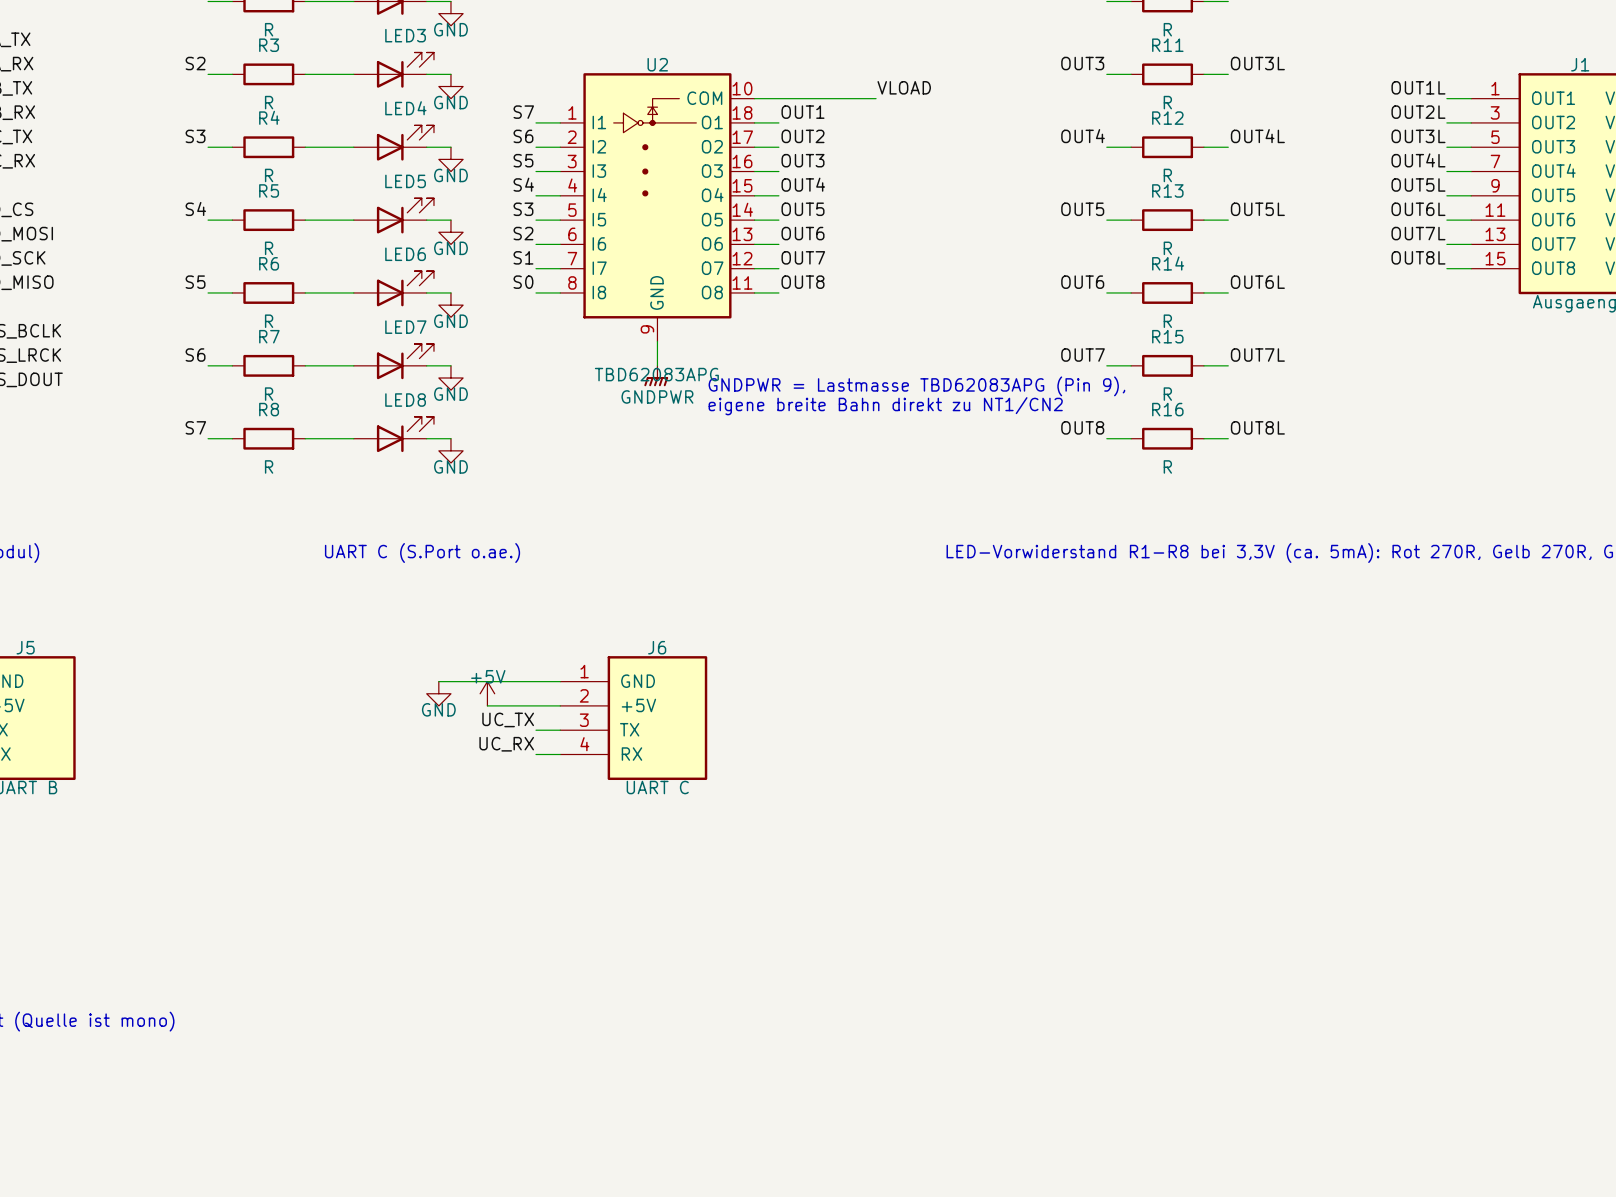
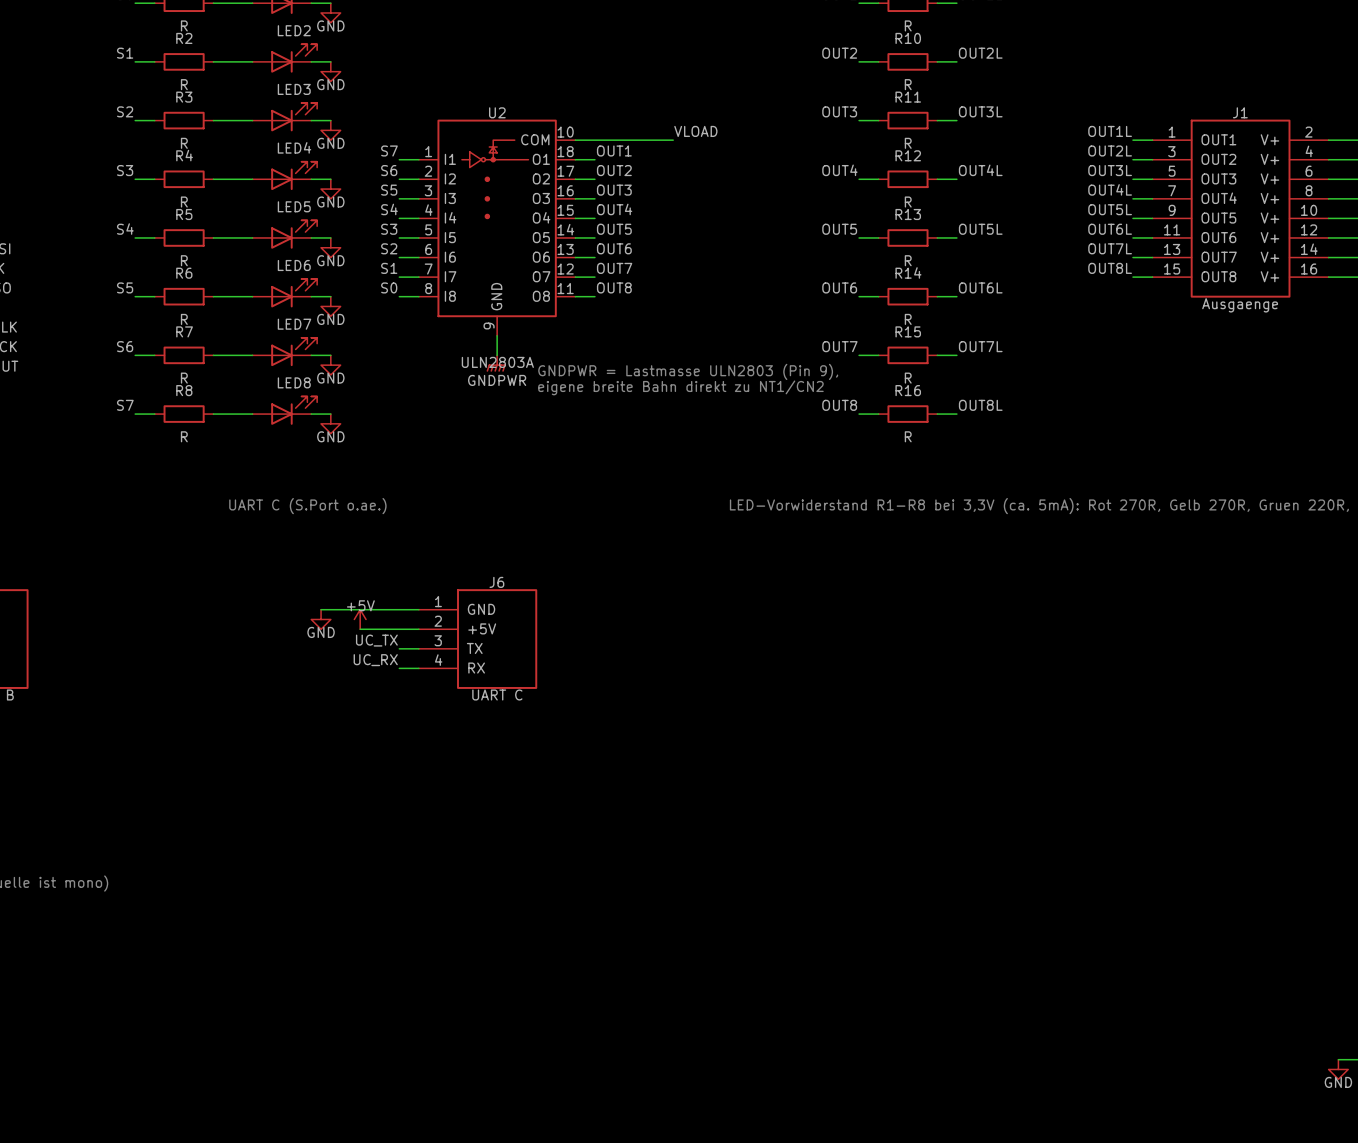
U2 value: TBD62083APG (656, 374) -> ULN2803A (497, 362)
text: GNDPWR = Lastmasse TBD62083APG (Pin 9), (916, 386) -> GNDPWR = Lastmasse ULN2803 (Pin 9), (688, 371)

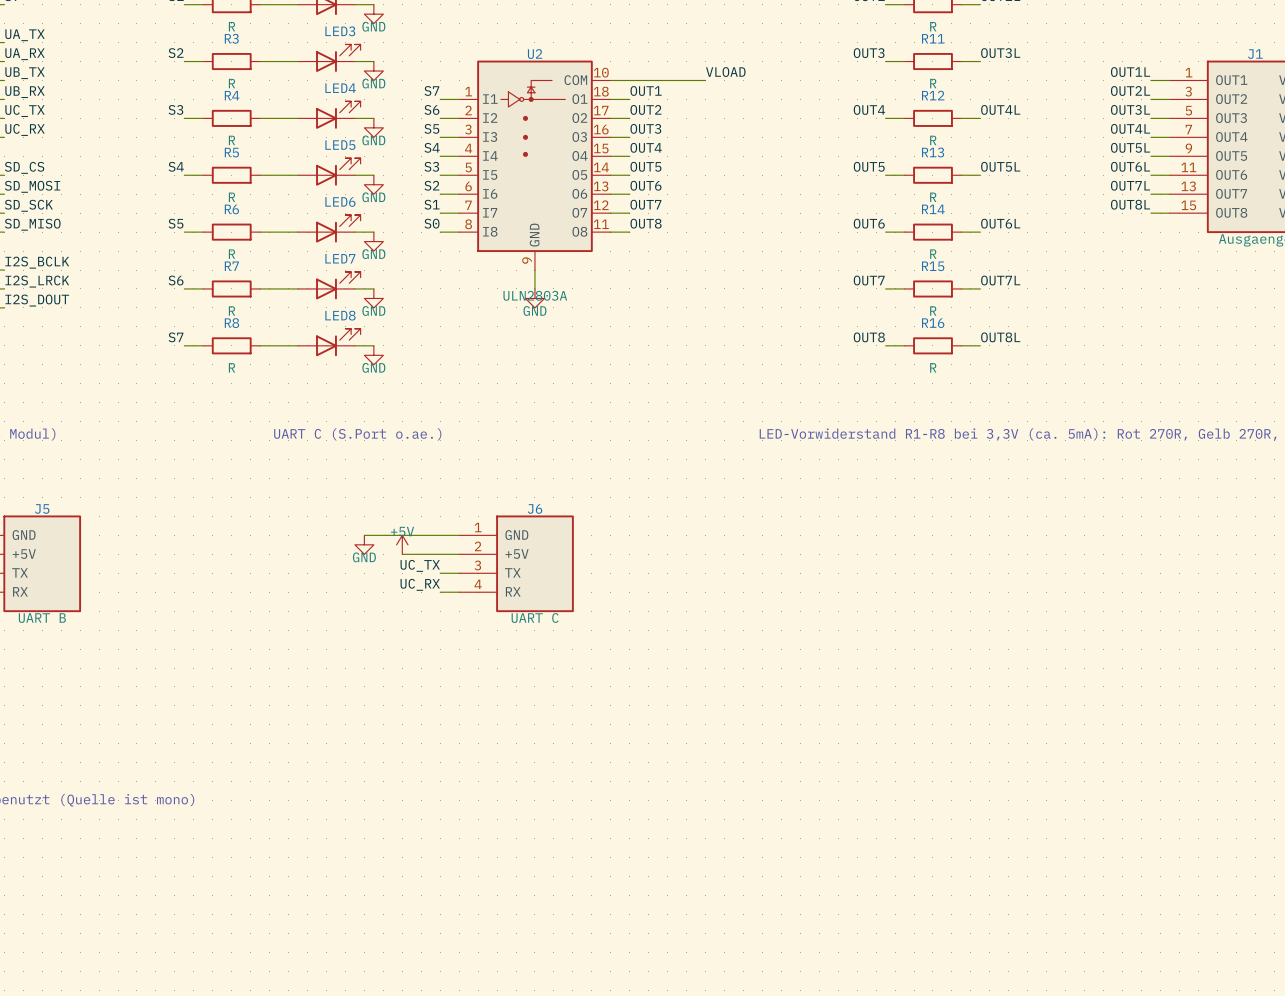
power symbol: GNDPWR (496, 363) -> GND (534, 298)
text: GNDPWR = Lastmasse ULN2803 (Pin 9), (688, 371) -> none
text: eigene breite Bahn direkt zu NT1/CN2 (680, 387) -> none

